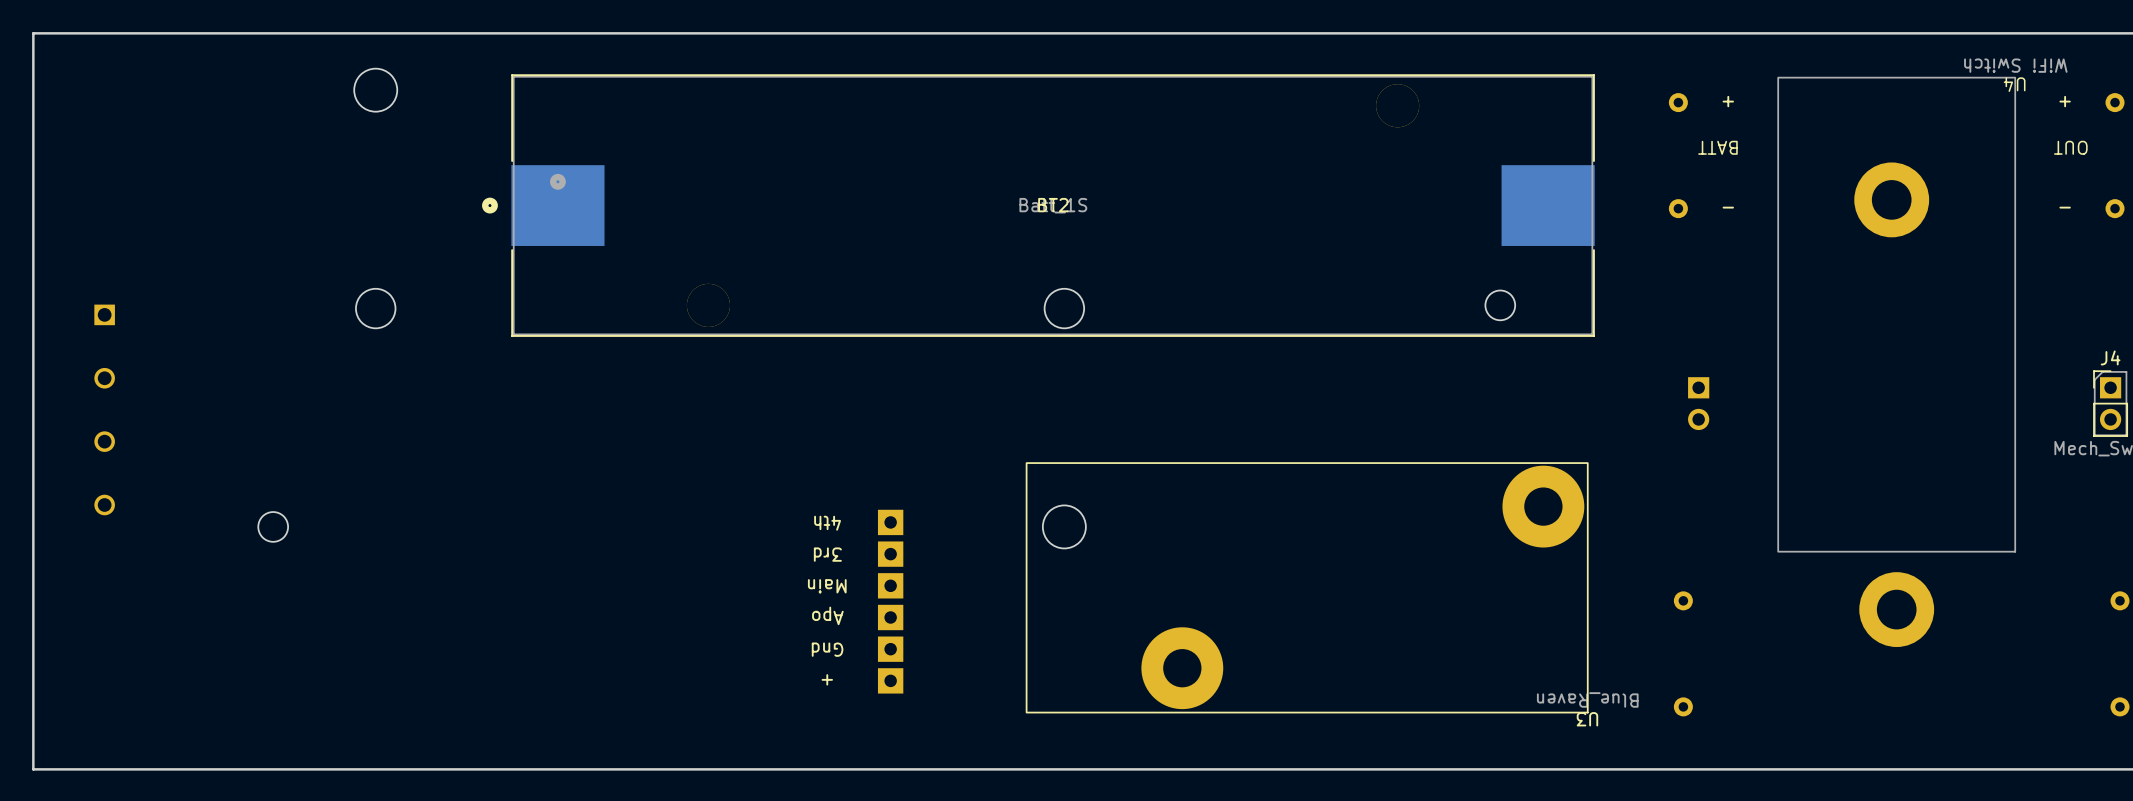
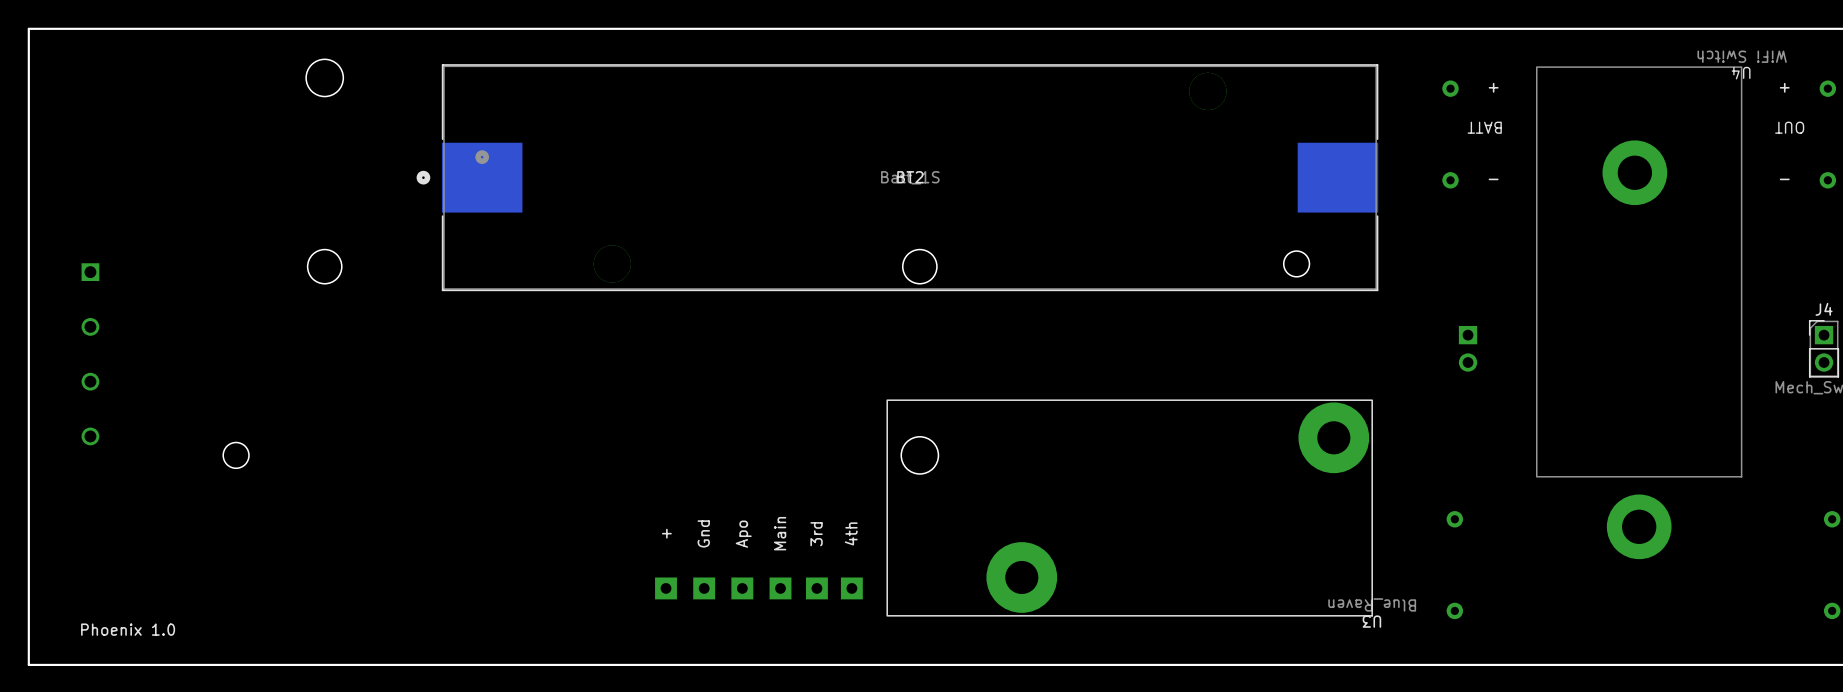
U3 footprint: [877, 462, 1589, 714] -> [655, 399, 1373, 617]
text: none -> Phoenix 1.0 (128, 629)

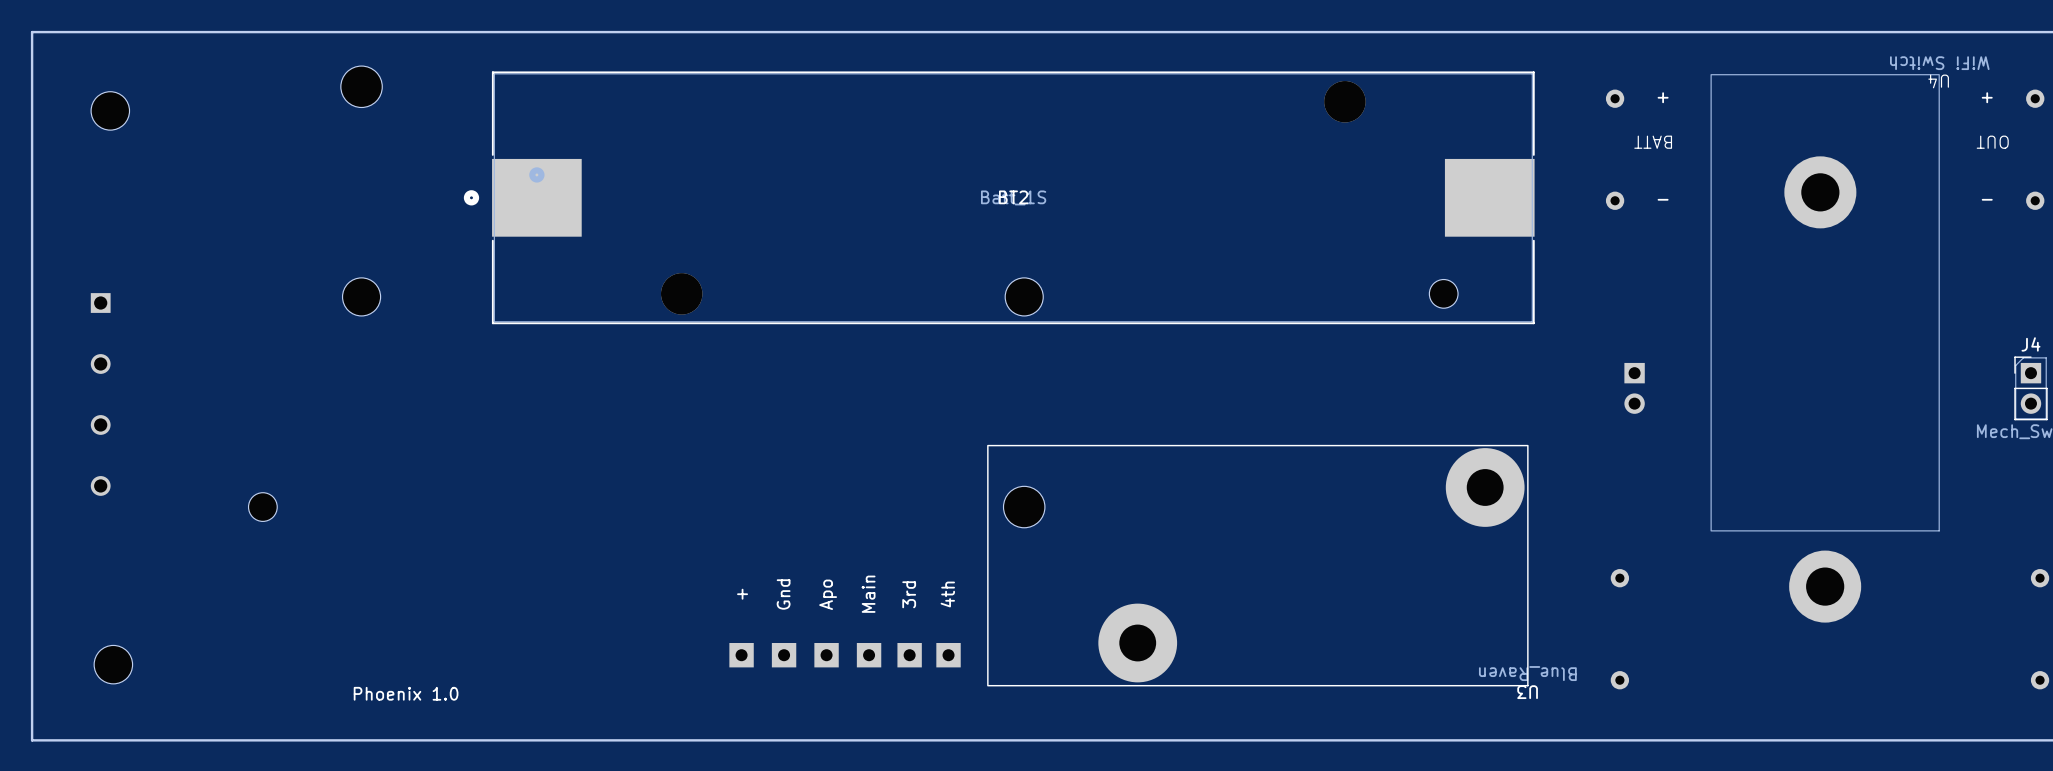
part: none -> (110, 110)
part: none -> (113, 664)
text position: Phoenix 1.0 (128, 629) -> Phoenix 1.0 (406, 693)

